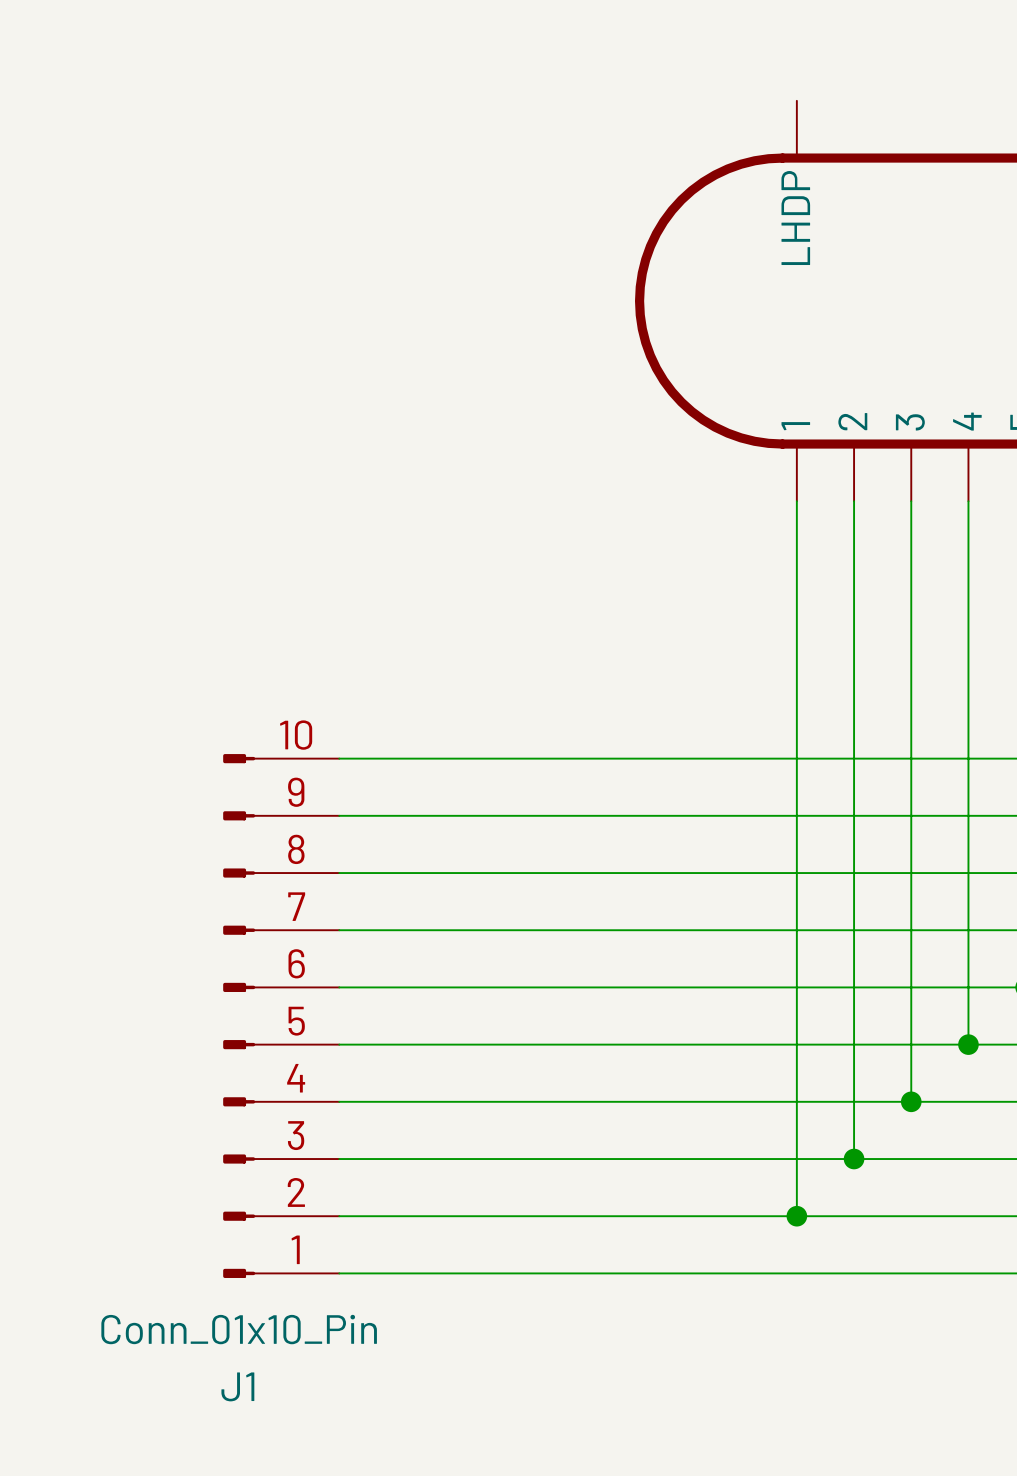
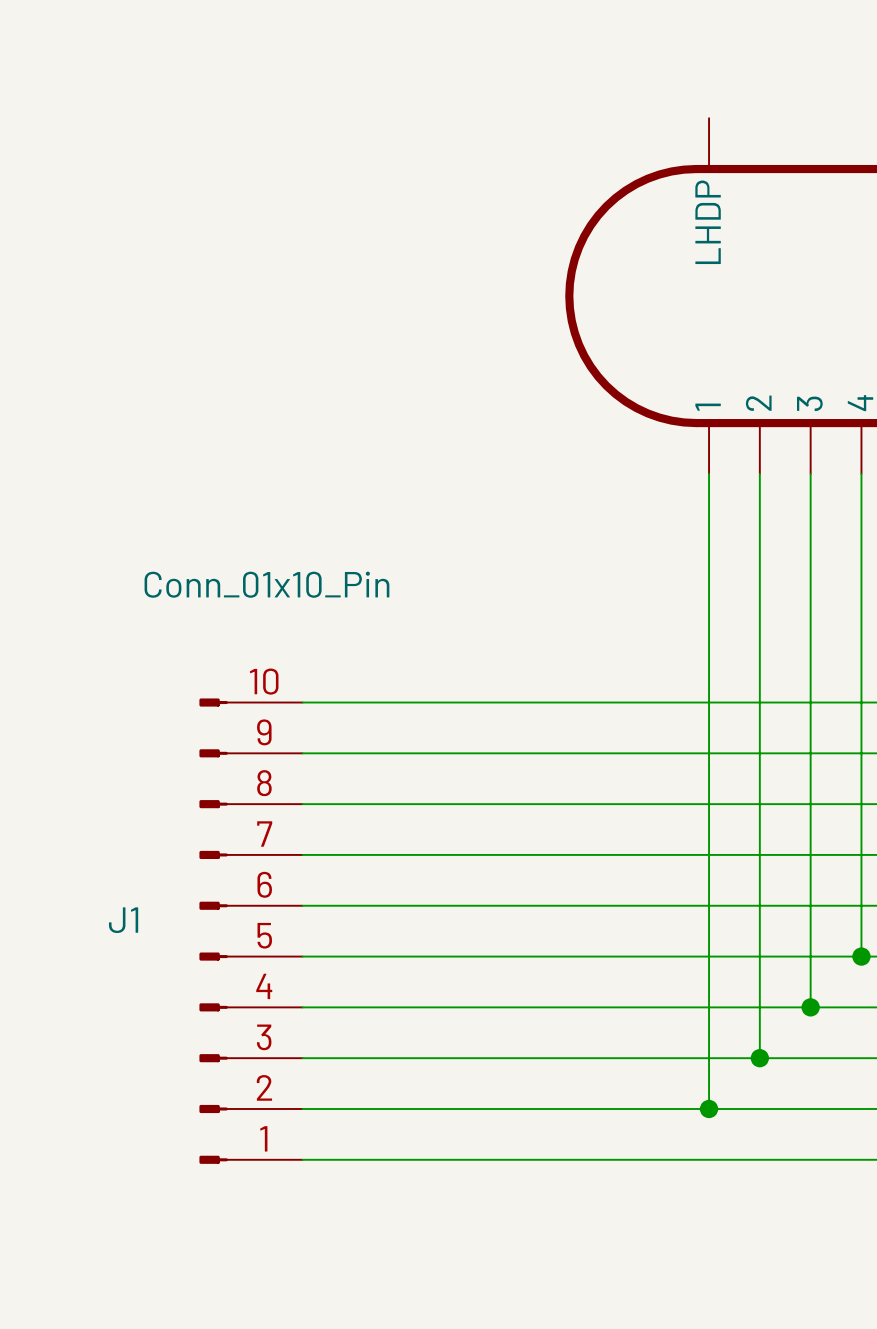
J1 value position: Conn_01x10_Pin (239, 1329) -> Conn_01x10_Pin (266, 584)
J1 name position: J1 (237, 1386) -> J1 (123, 920)

